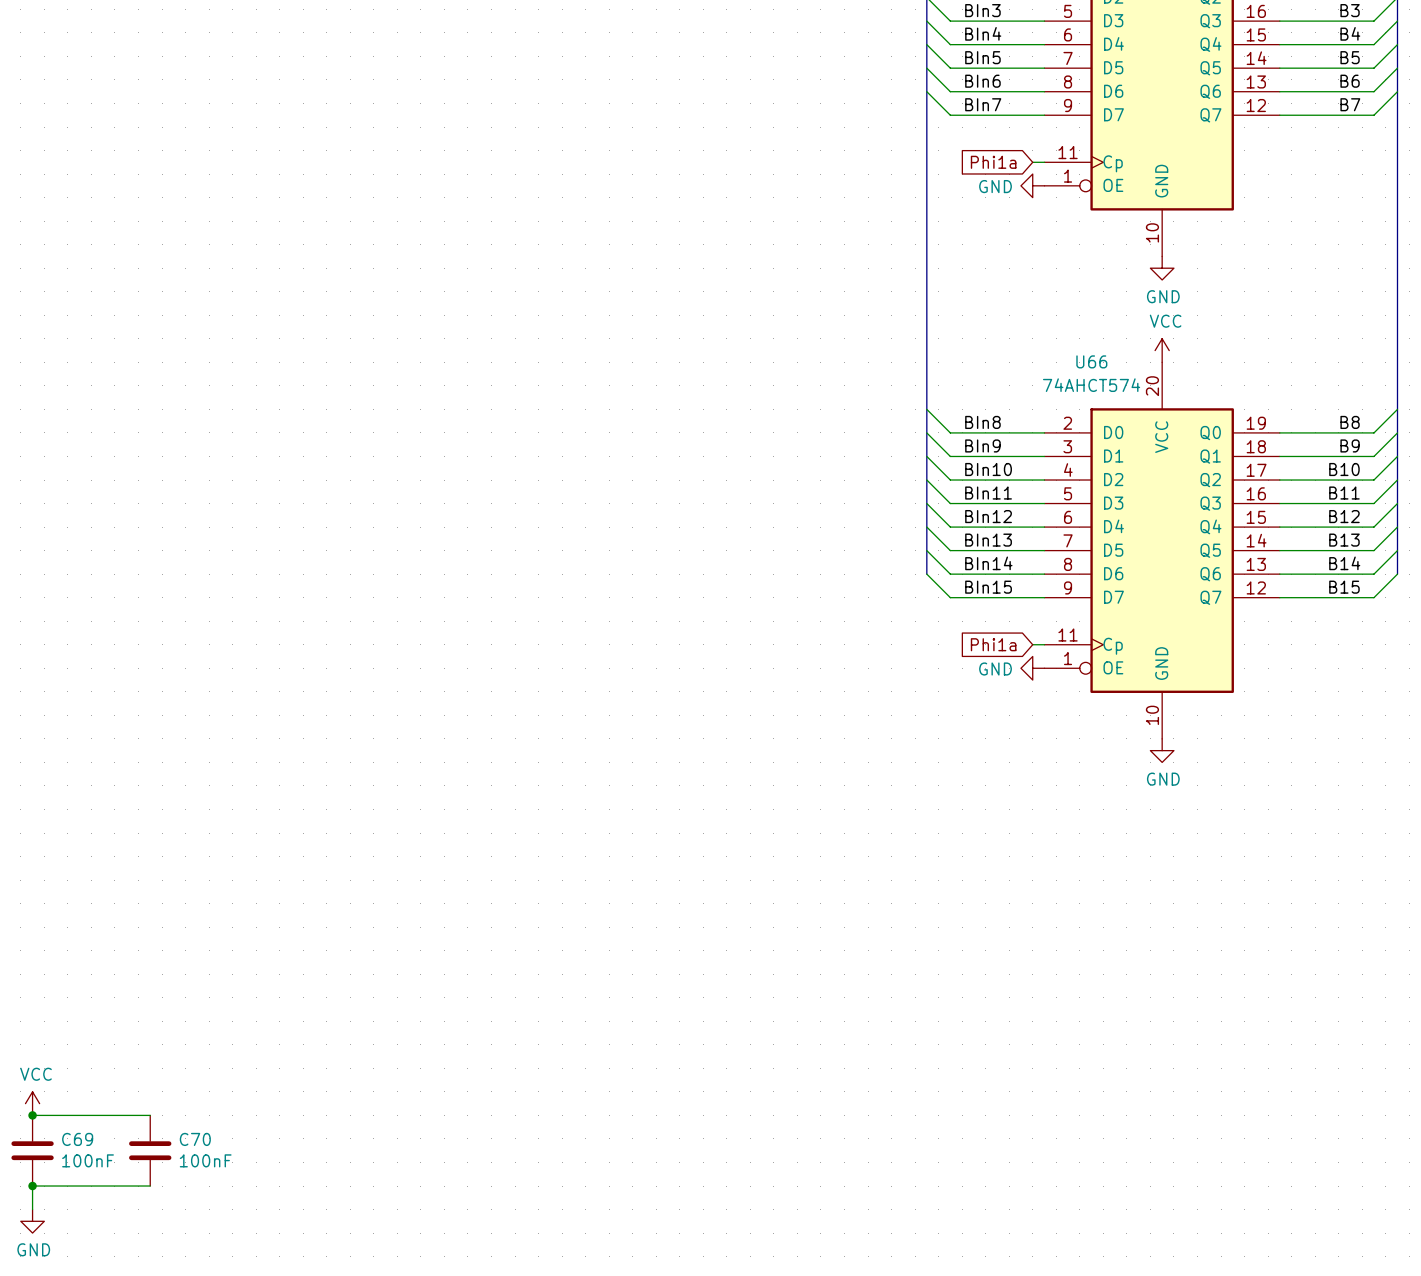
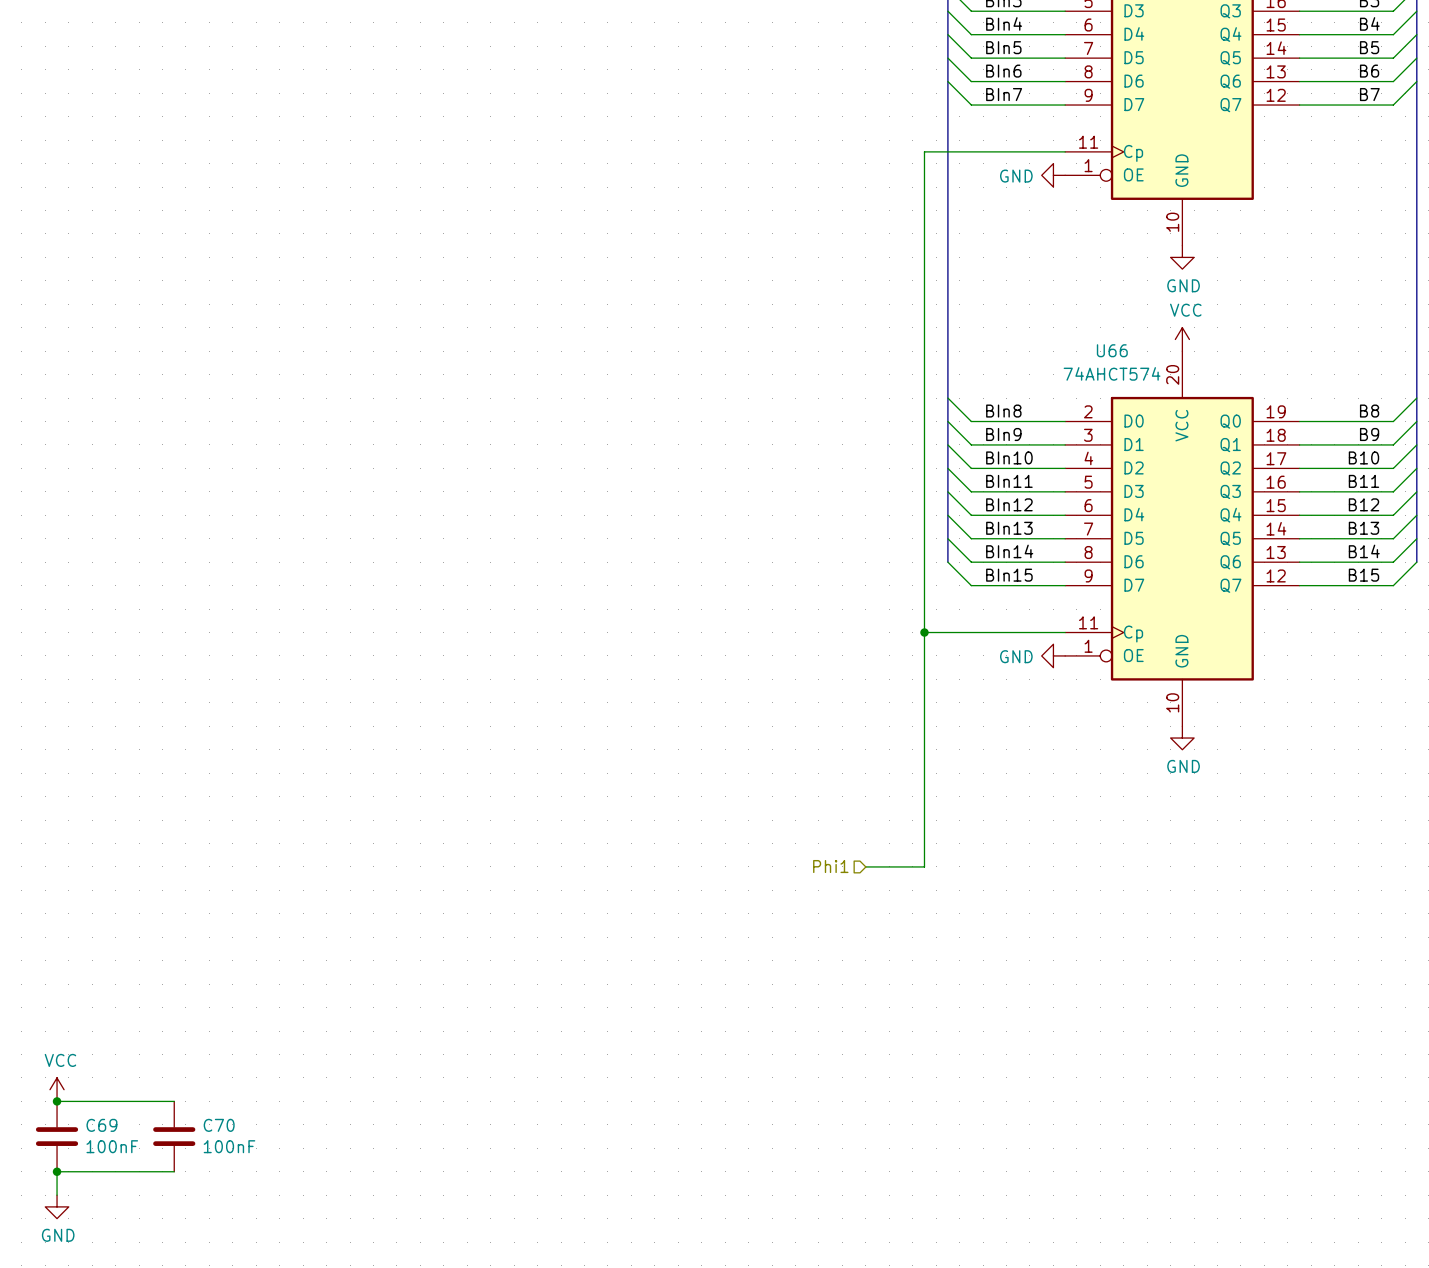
global label: Phi1a (993, 162) -> none
wire: none -> (1053, 151) (924, 151) (924, 866) (865, 866)
wire: none -> (924, 632) (1053, 632)
junction: none -> (924, 632)
global label: Phi1a (993, 644) -> none
hierarchical label: none -> Phi1 (830, 866)

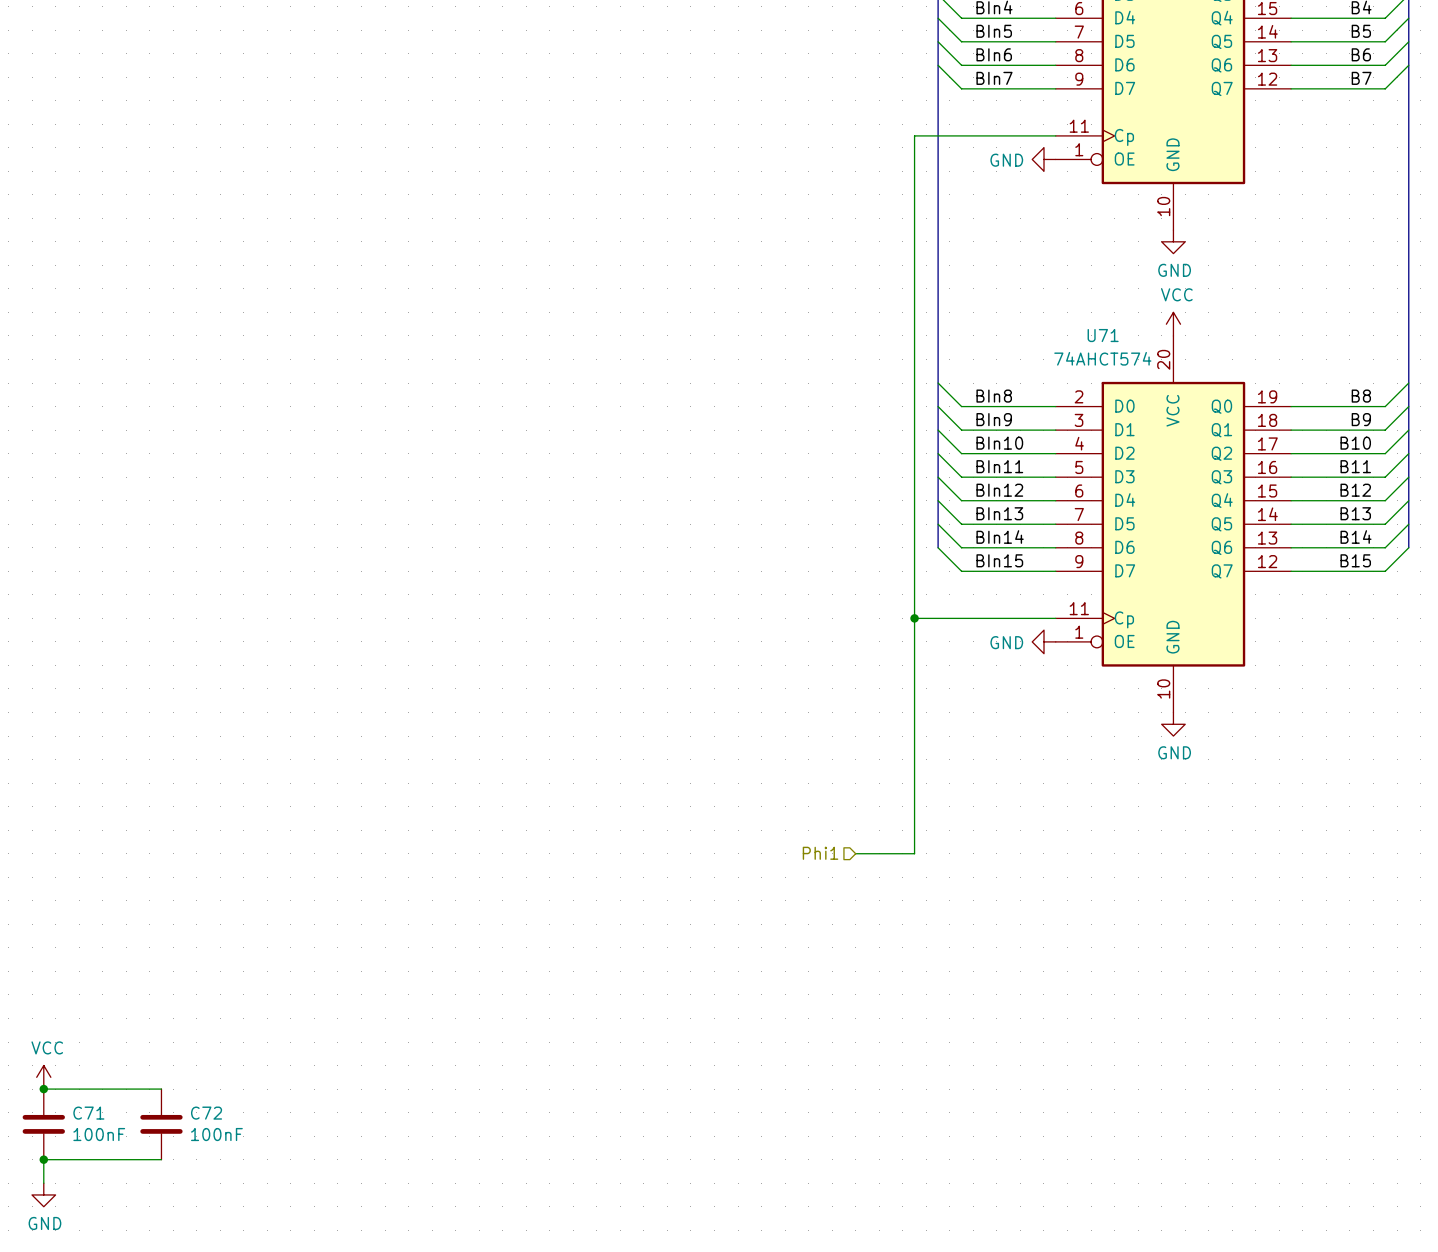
U66 name: U66 (1112, 350) -> U71 (1103, 335)
C69 name: C69 (101, 1125) -> C71 (88, 1113)
C70 name: C70 (219, 1125) -> C72 (206, 1113)

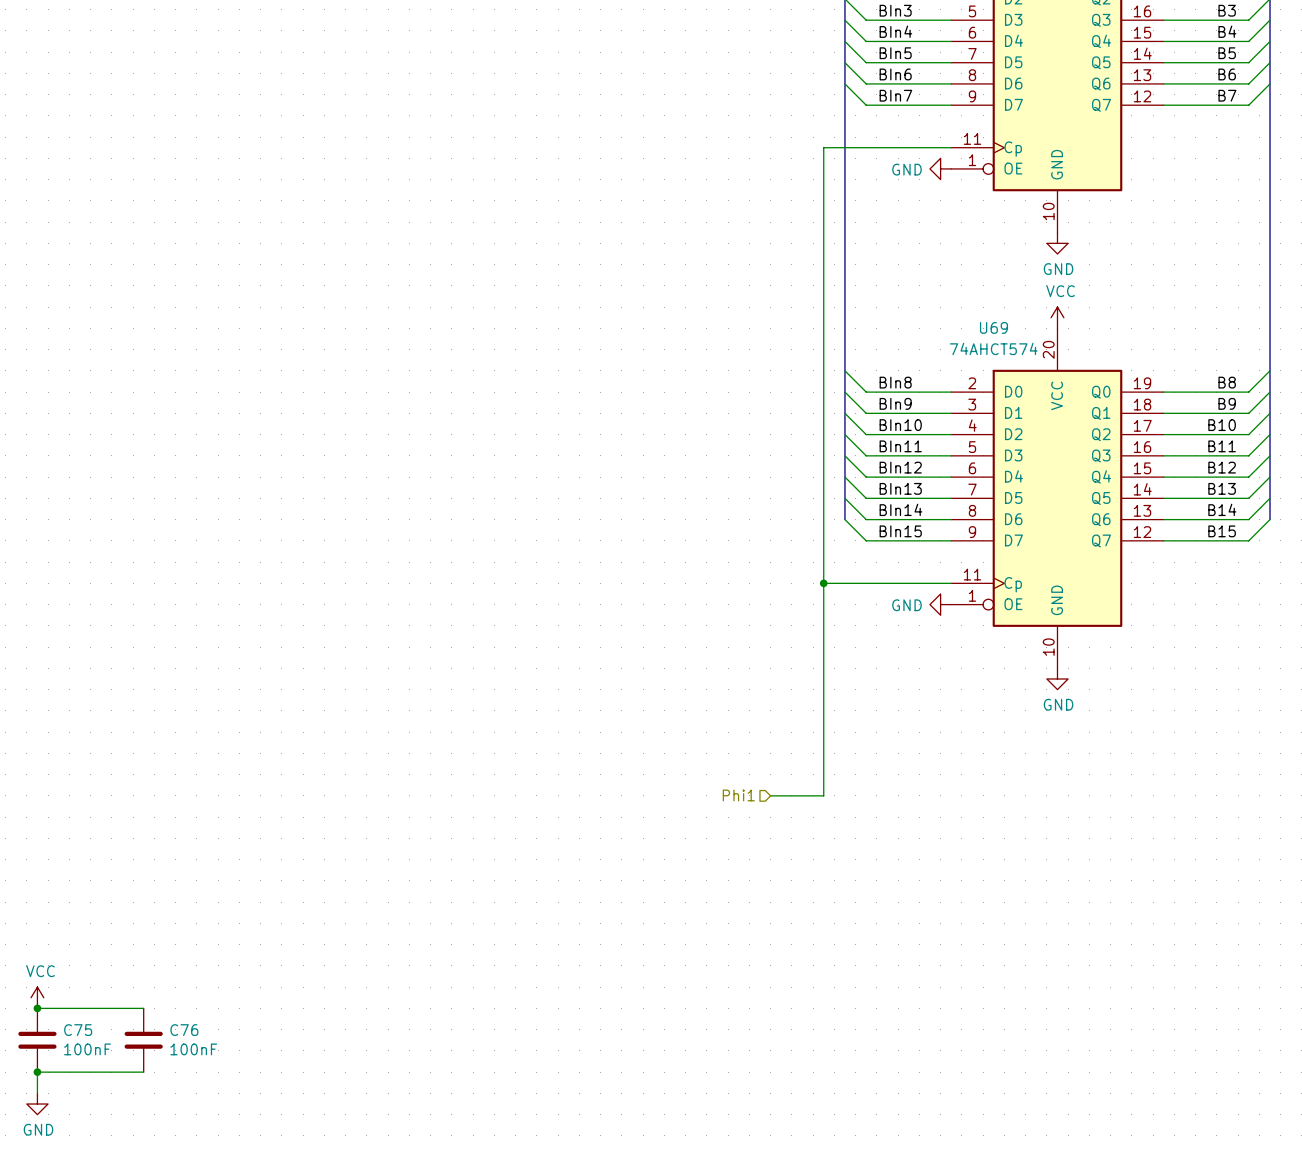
U71 name: U71 (1103, 335) -> U69 (993, 327)
C71 name: C71 (88, 1113) -> C75 (78, 1030)
C72 name: C72 (206, 1113) -> C76 (184, 1030)

